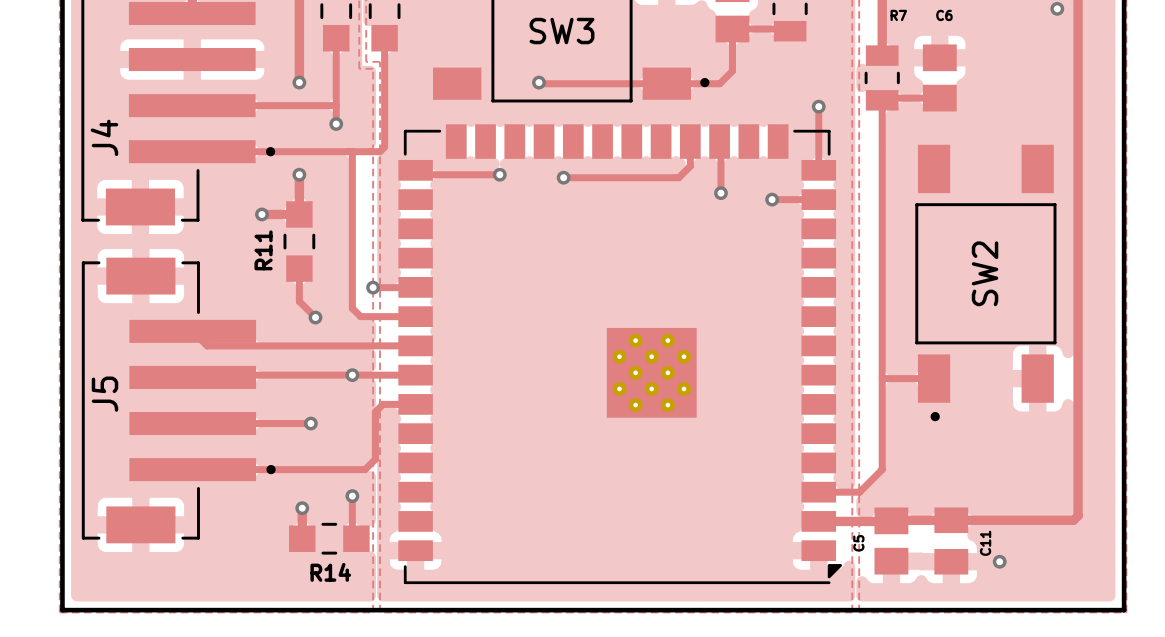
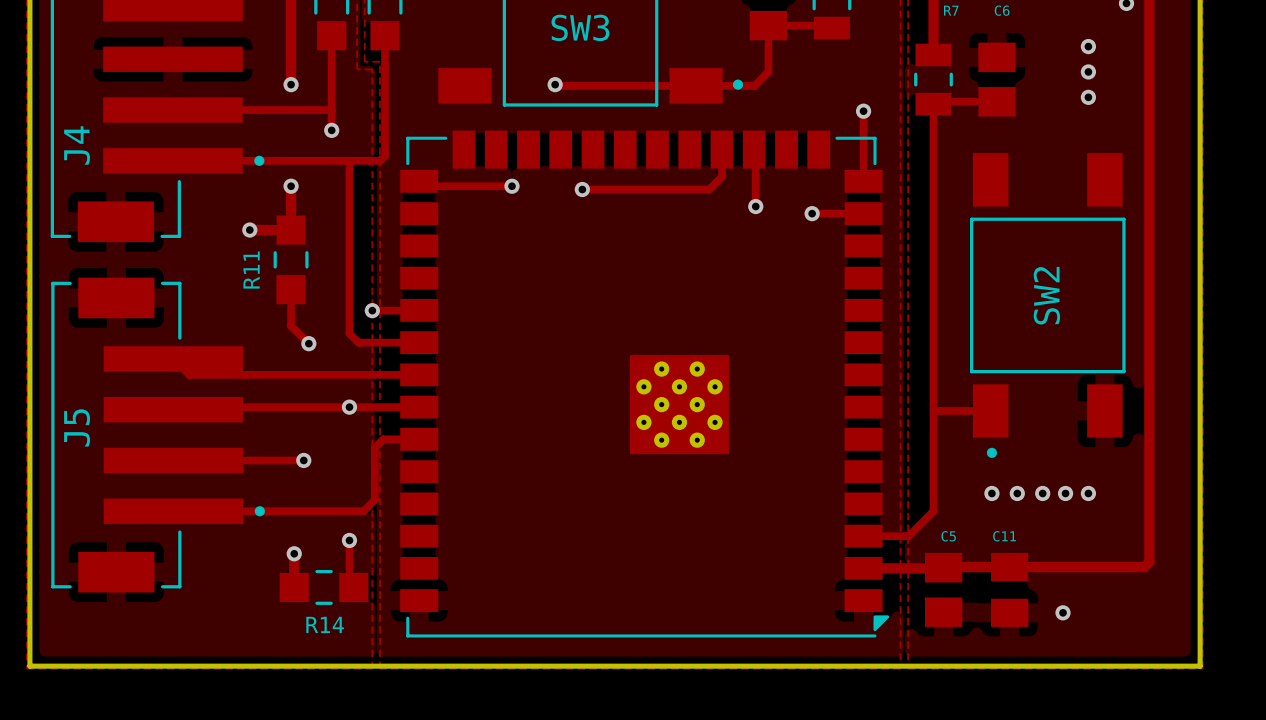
via: none -> (1088, 46)
via: none -> (1088, 71)
via: none -> (1088, 97)
via: none -> (991, 493)
via: none -> (1017, 493)
via: none -> (1042, 493)
via: none -> (1065, 493)
via: none -> (1088, 493)
C5 name rotation: 0° (858, 543) -> 90° clockwise (948, 536)
C5 name position: C5 (858, 543) -> C5 (948, 536)
C11 name rotation: 0° (985, 543) -> 90° clockwise (1004, 536)
C11 name position: C11 (985, 543) -> C11 (1004, 536)

